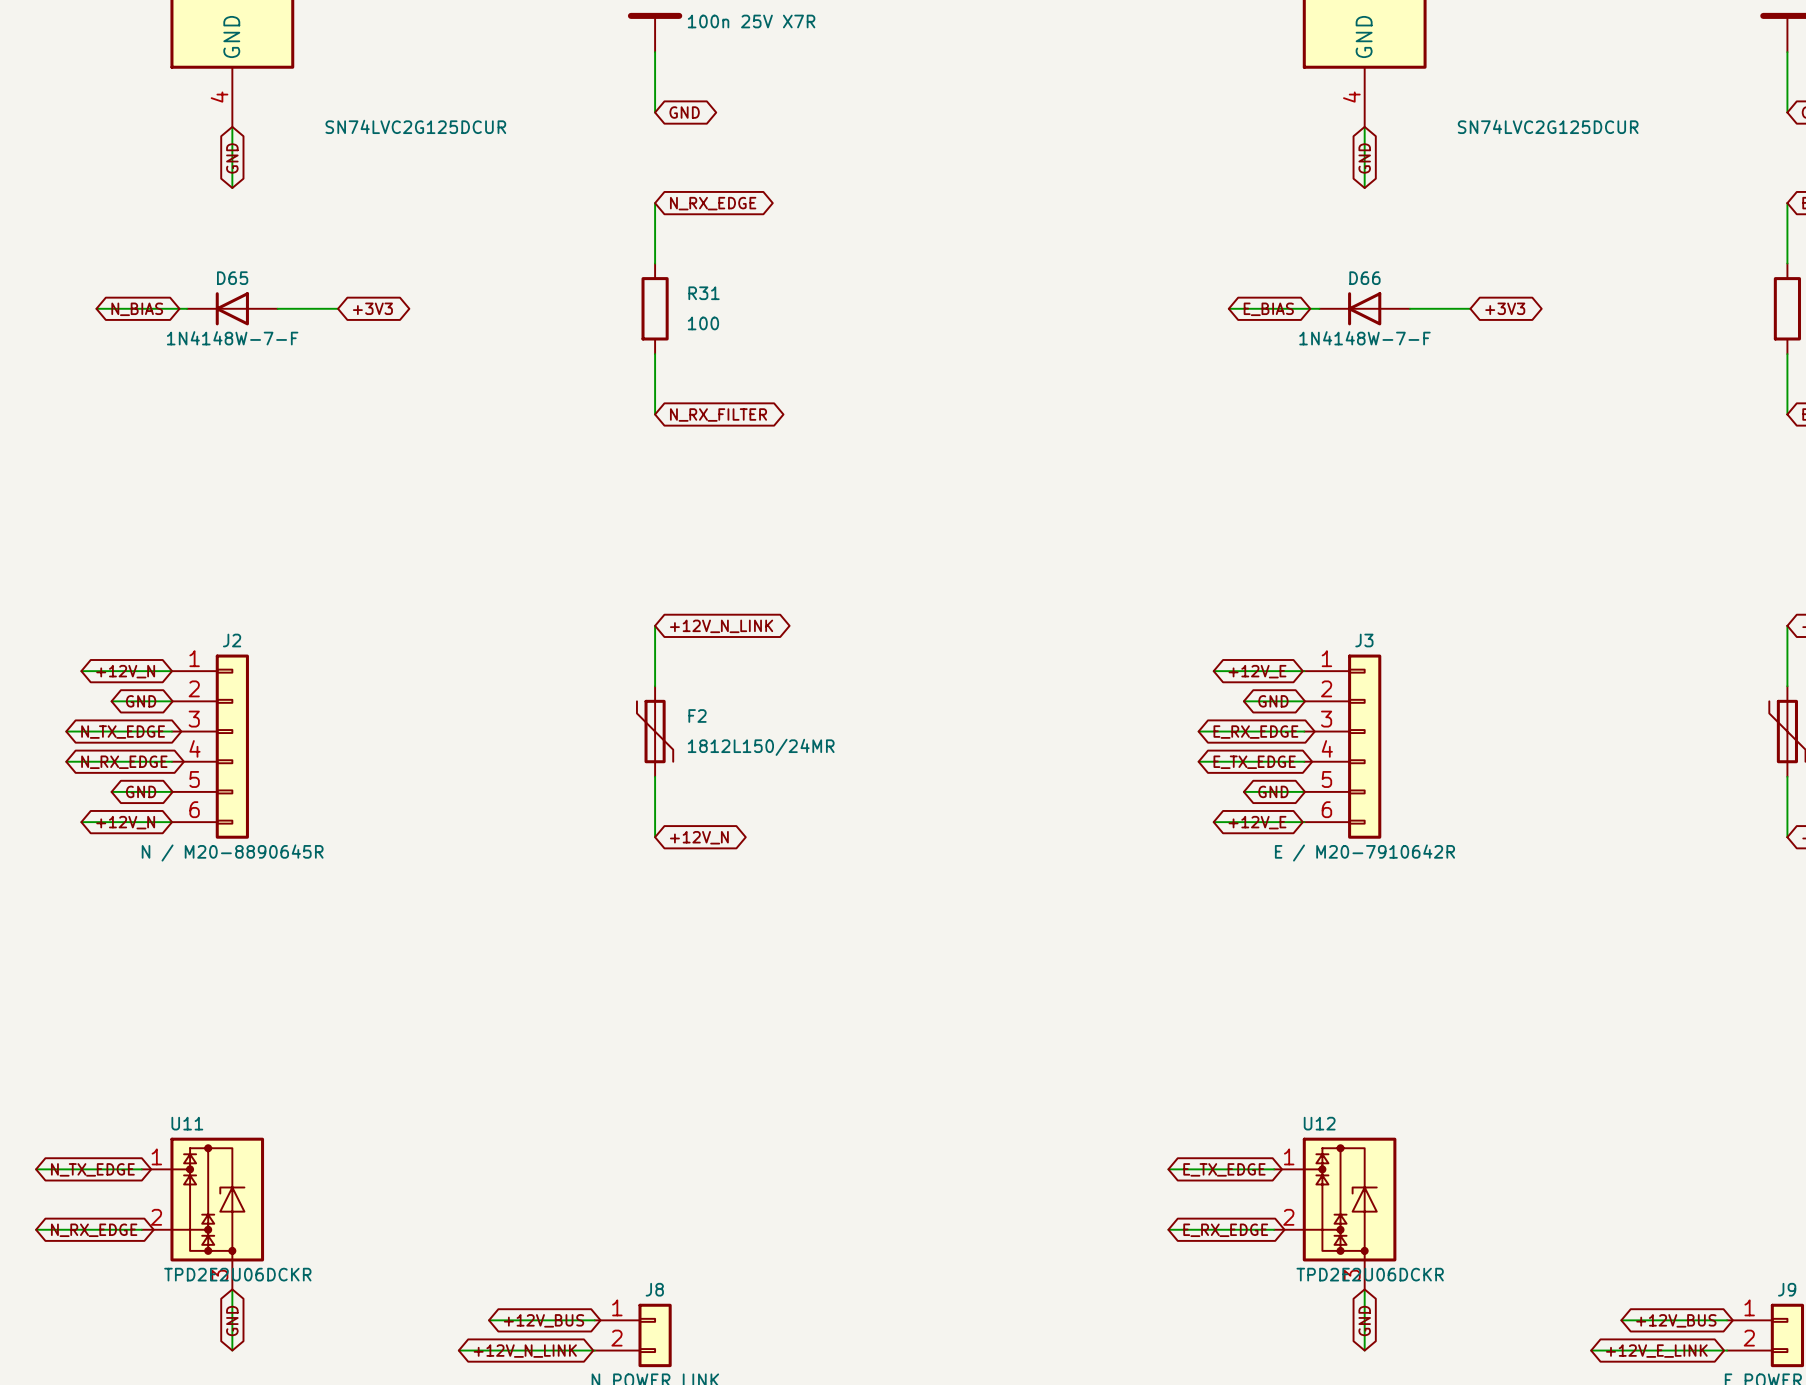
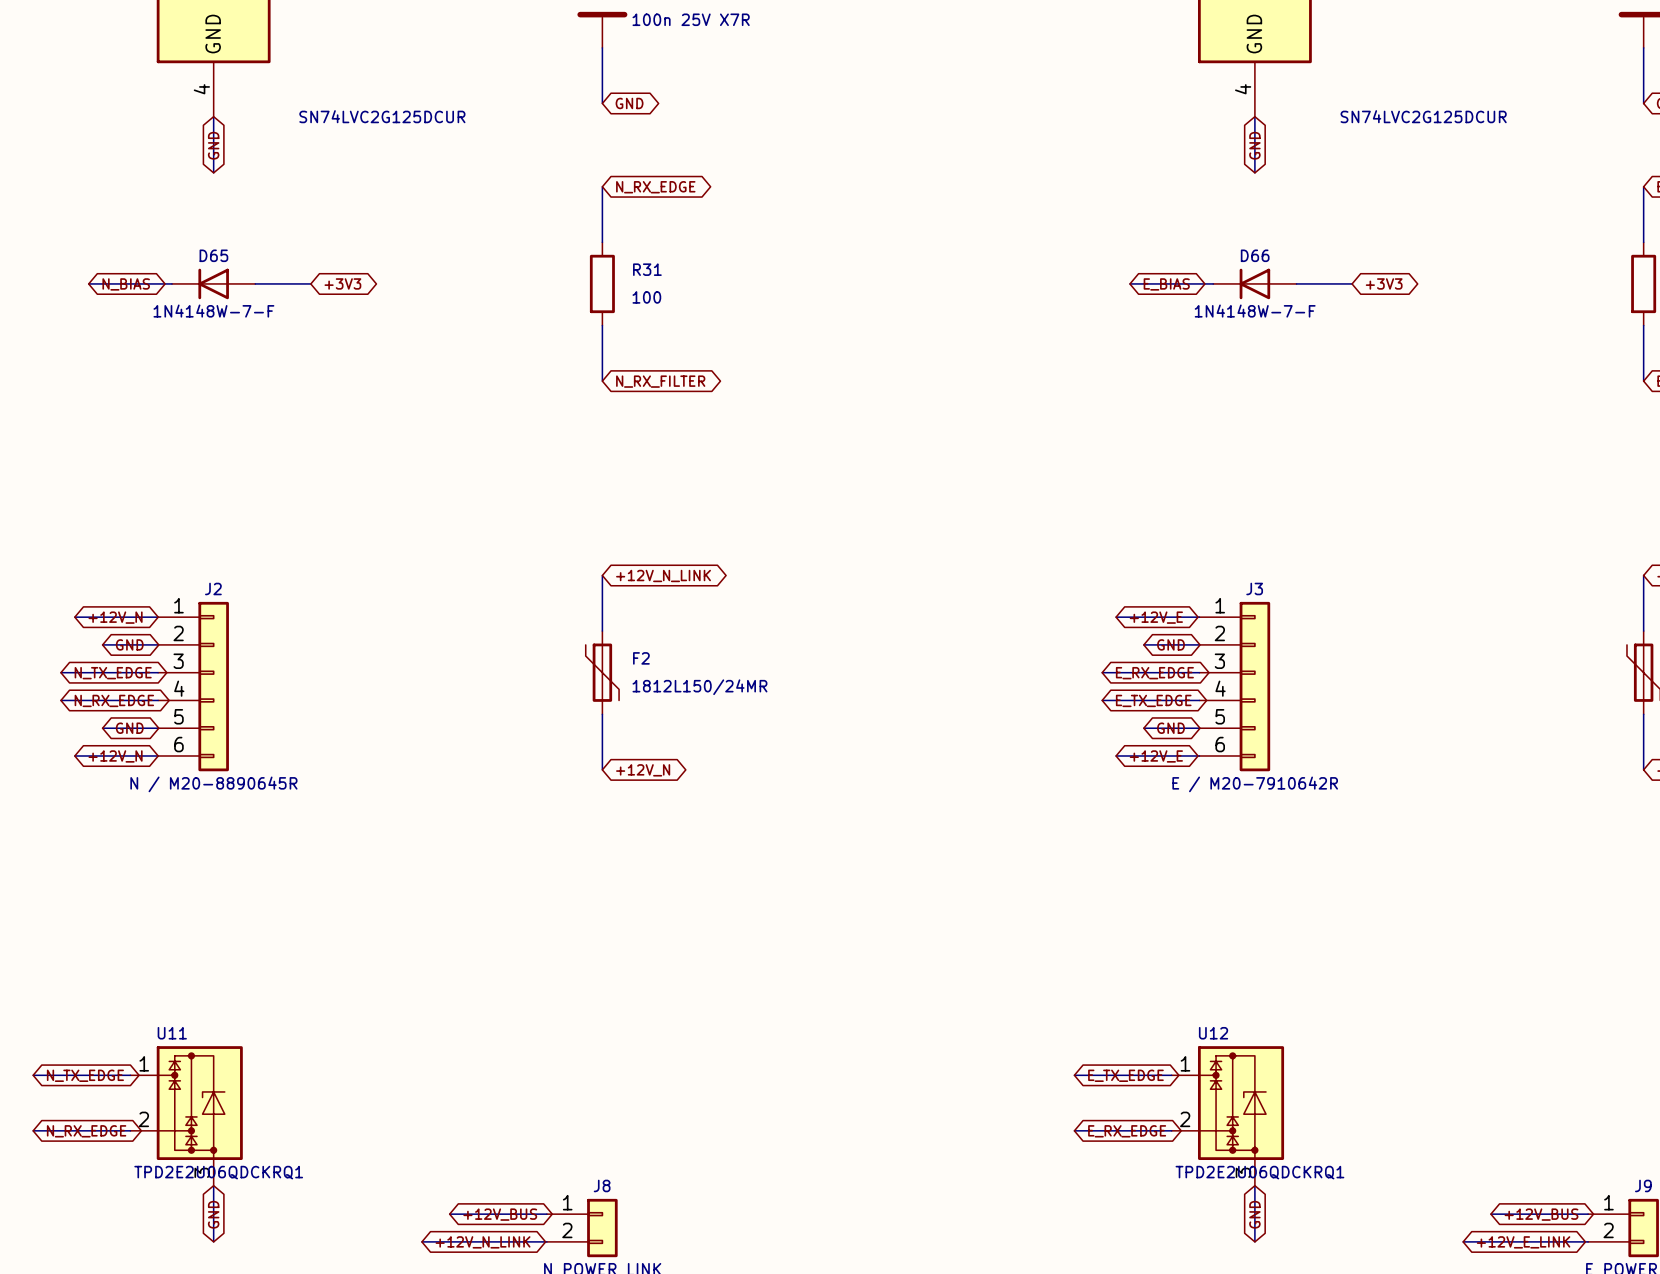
U11 value: TPD2E2U06DCKR (237, 1274) -> TPD2E2U06QDCKRQ1 (218, 1172)
U12 value: TPD2E2U06DCKR (1370, 1274) -> TPD2E2U06QDCKRQ1 (1259, 1172)

